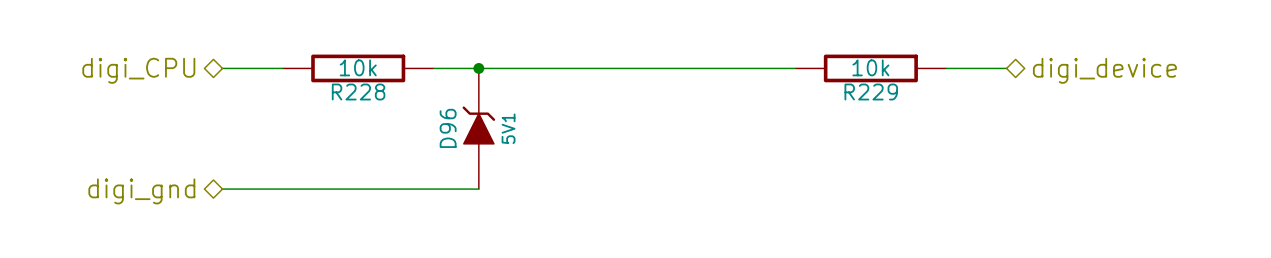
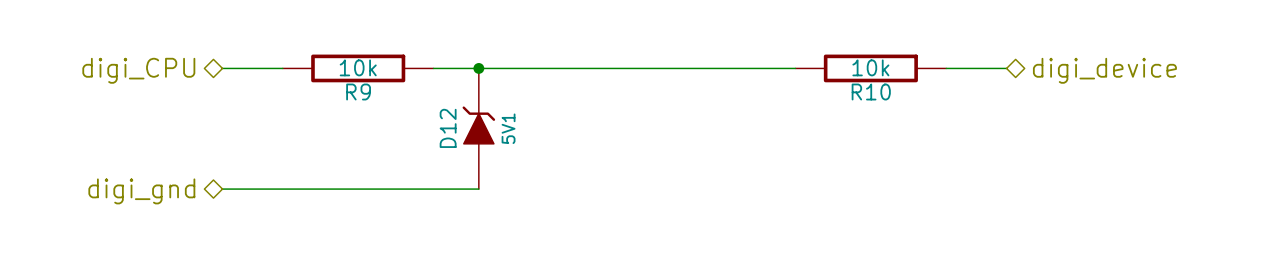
R228 name: R228 (358, 92) -> R9 (358, 92)
R229 name: R229 (871, 92) -> R10 (871, 92)
D96 name: D96 (448, 128) -> D12 (448, 128)

